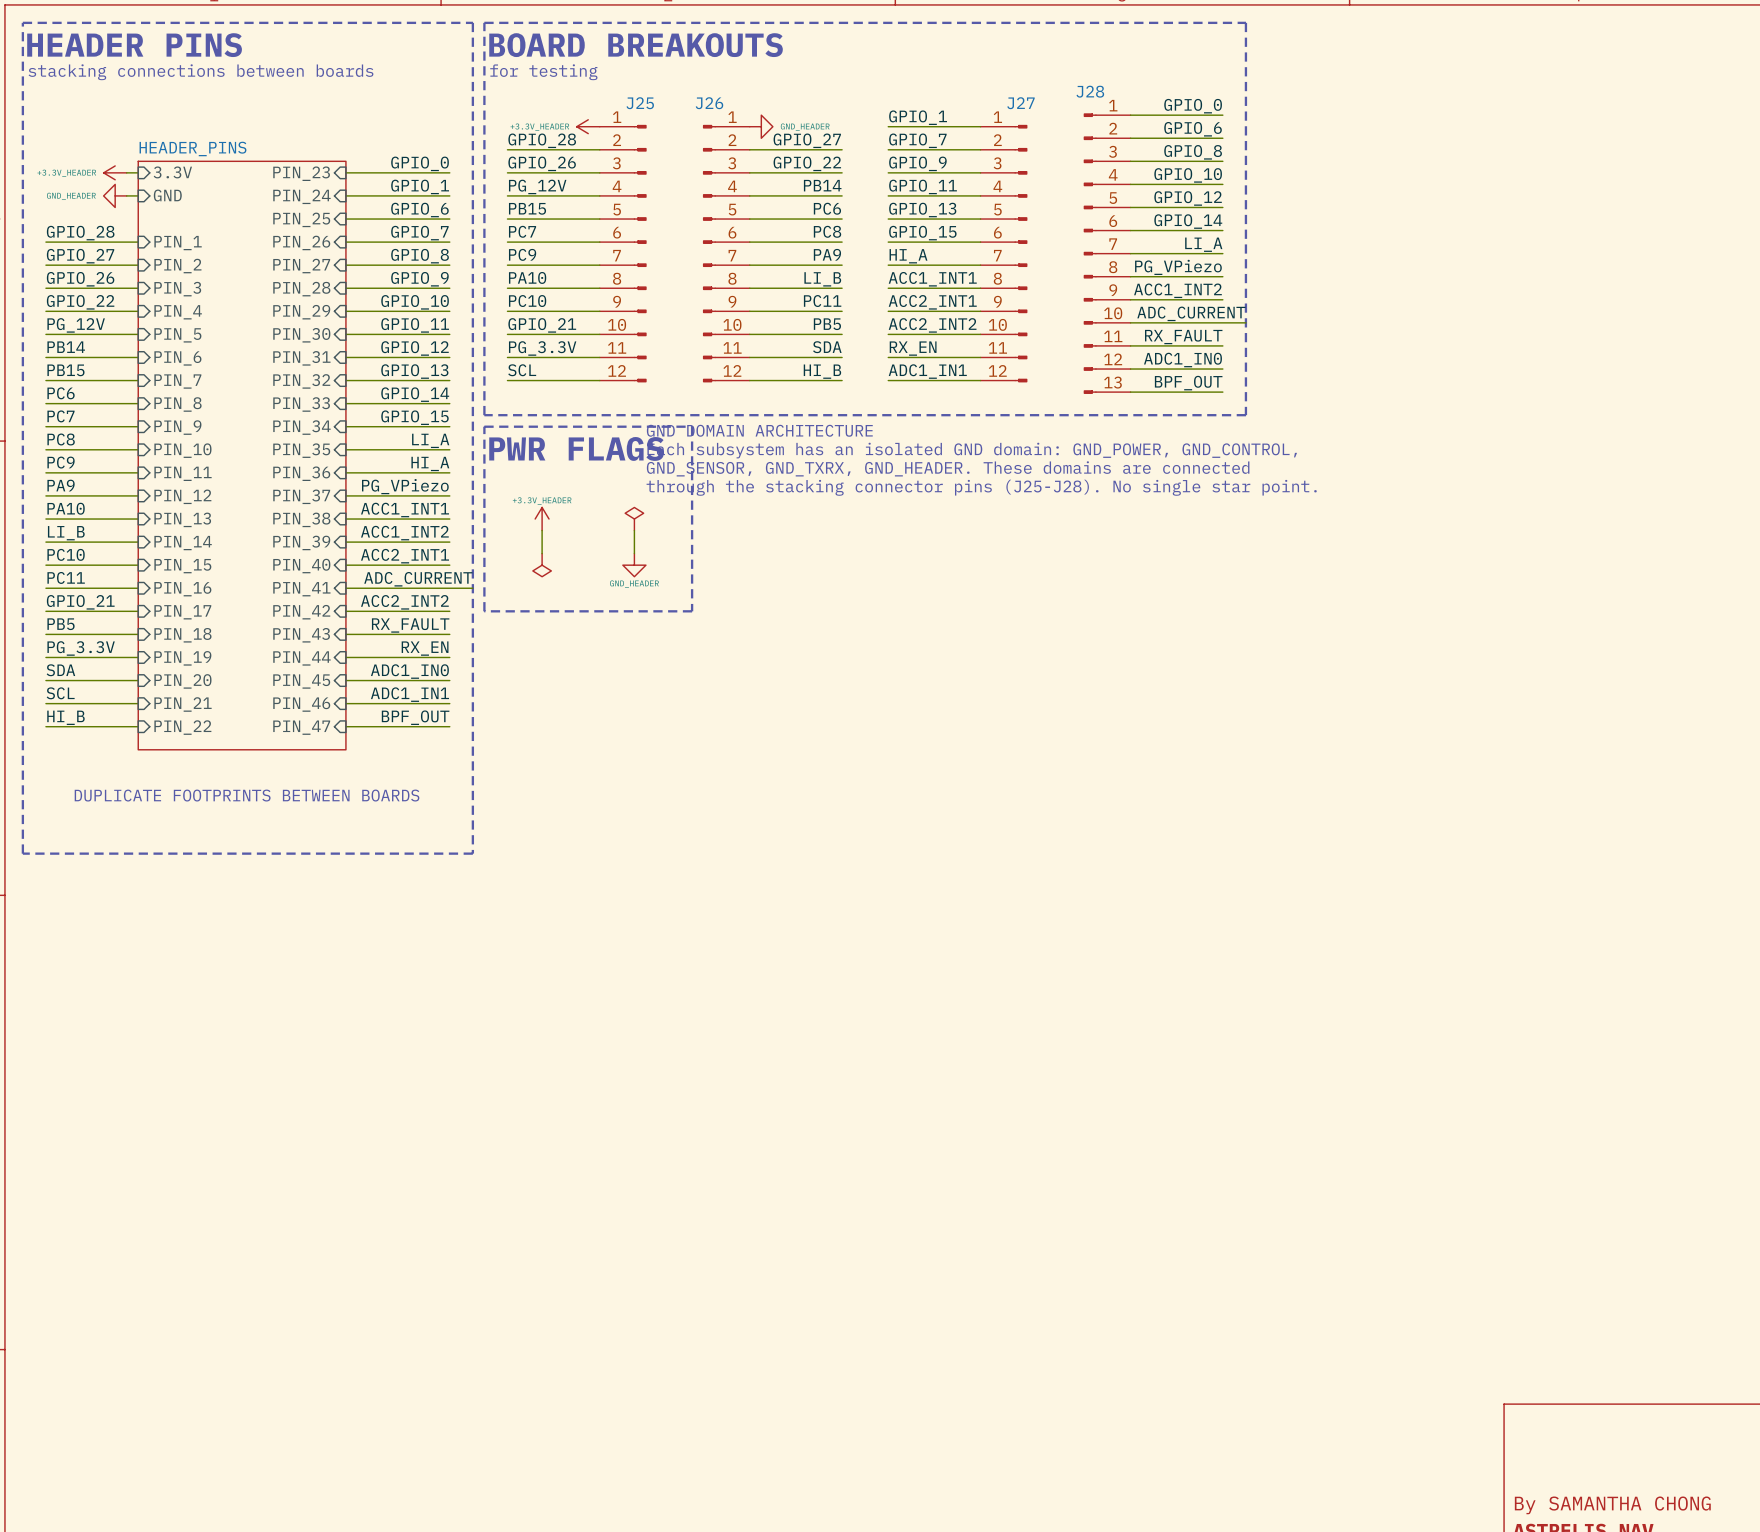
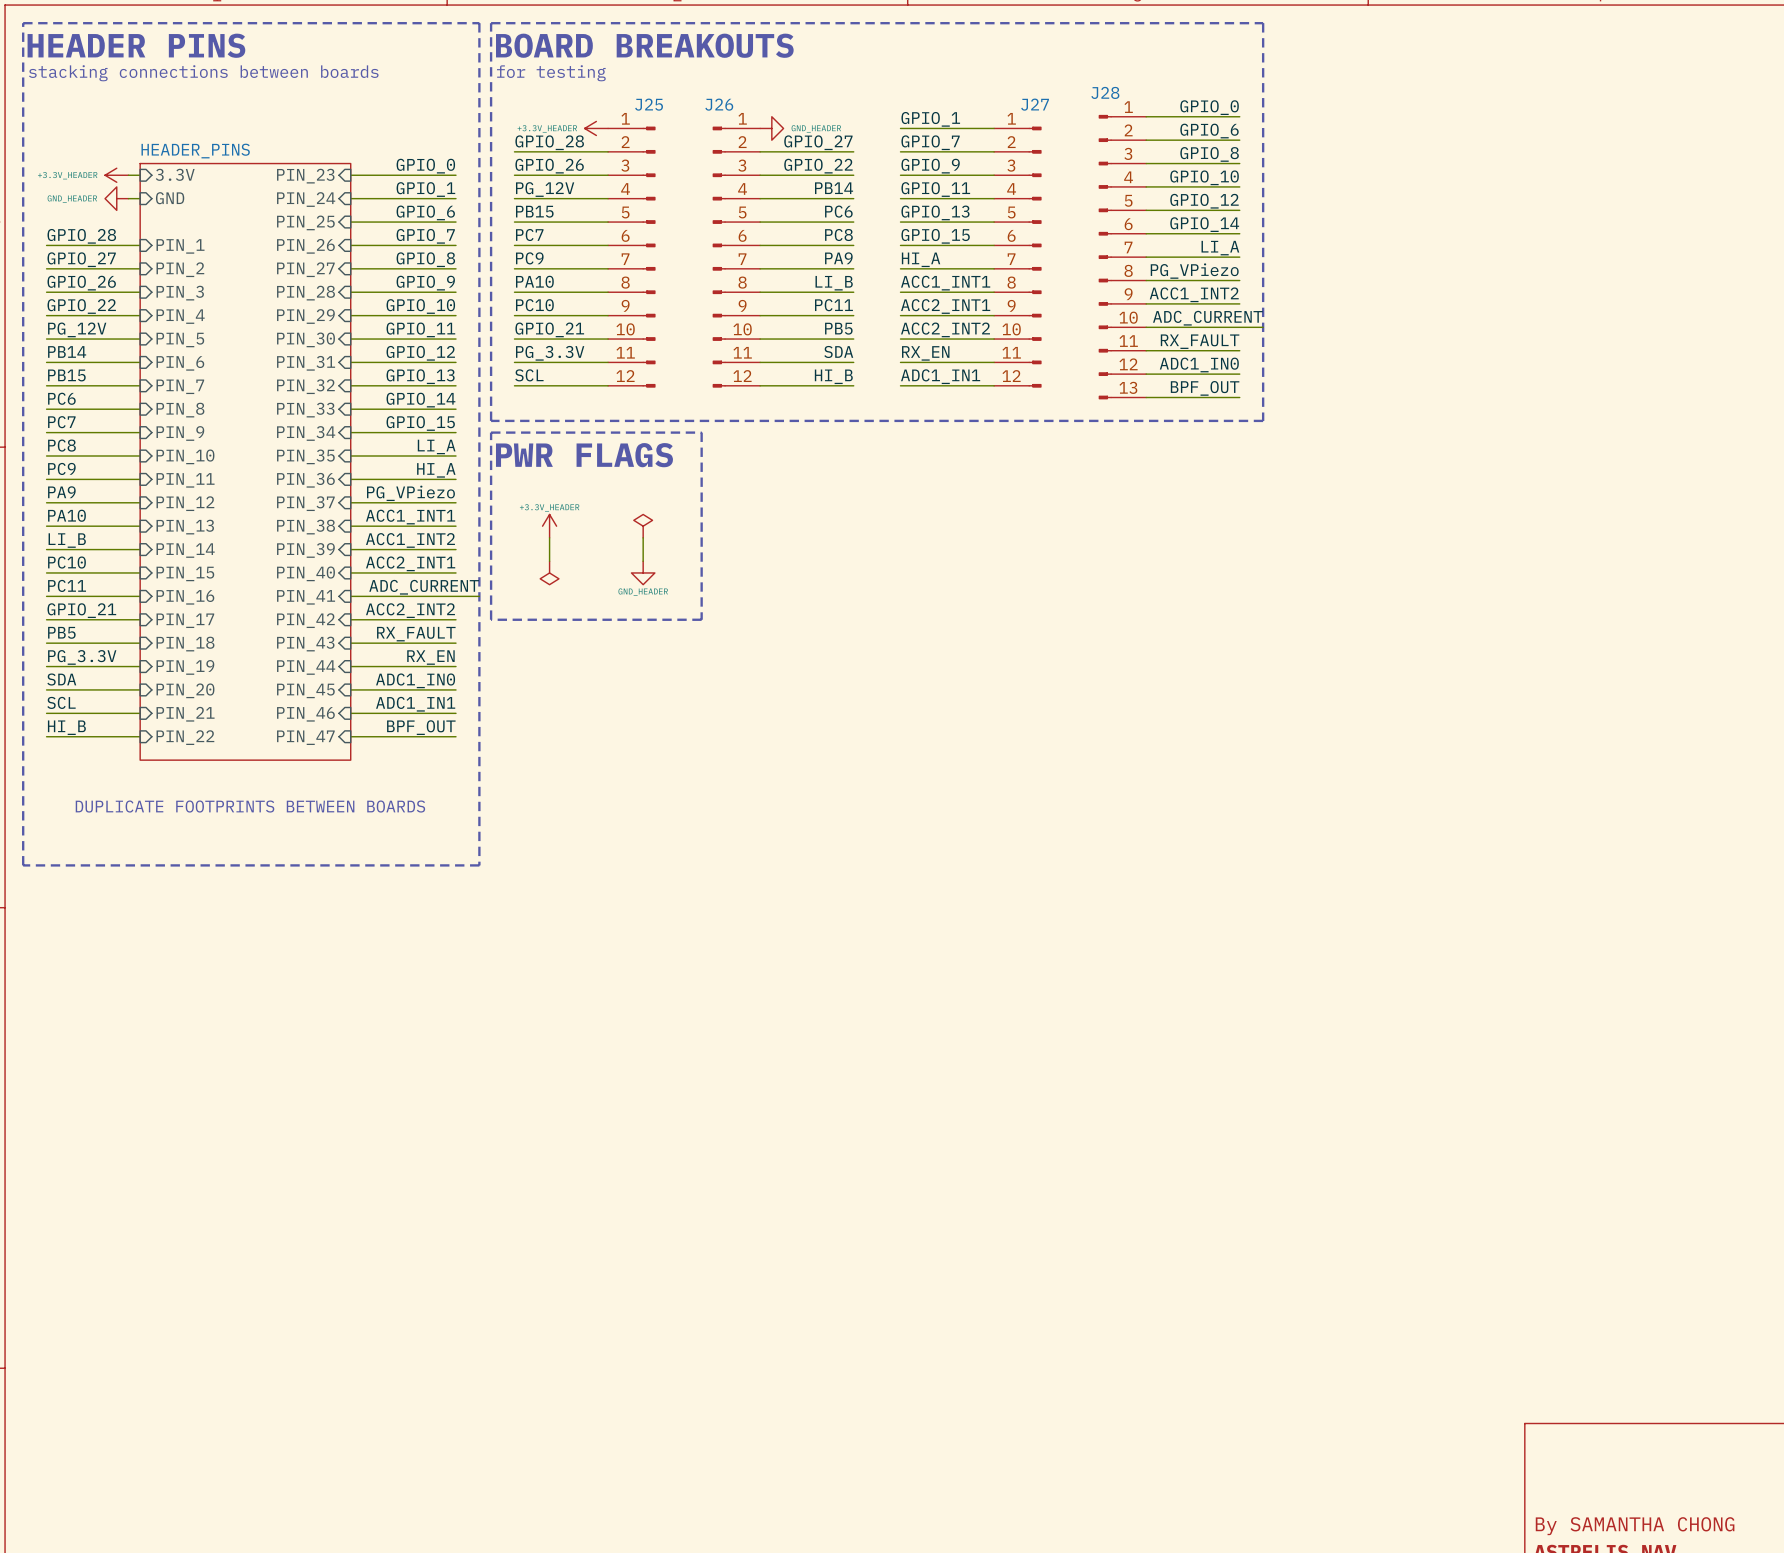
text: GND DOMAIN ARCHITECTURE (759, 430) -> none
text: Each subsystem has an isolated GND domain: GND_POWER, GND_CONTROL, (972, 450) -> none
text: GND_SENSOR, GND_TXRX, GND_HEADER. These domains are connected (948, 468) -> none
text: through the stacking connector pins (J25-J28). No single star point. (981, 487) -> none

